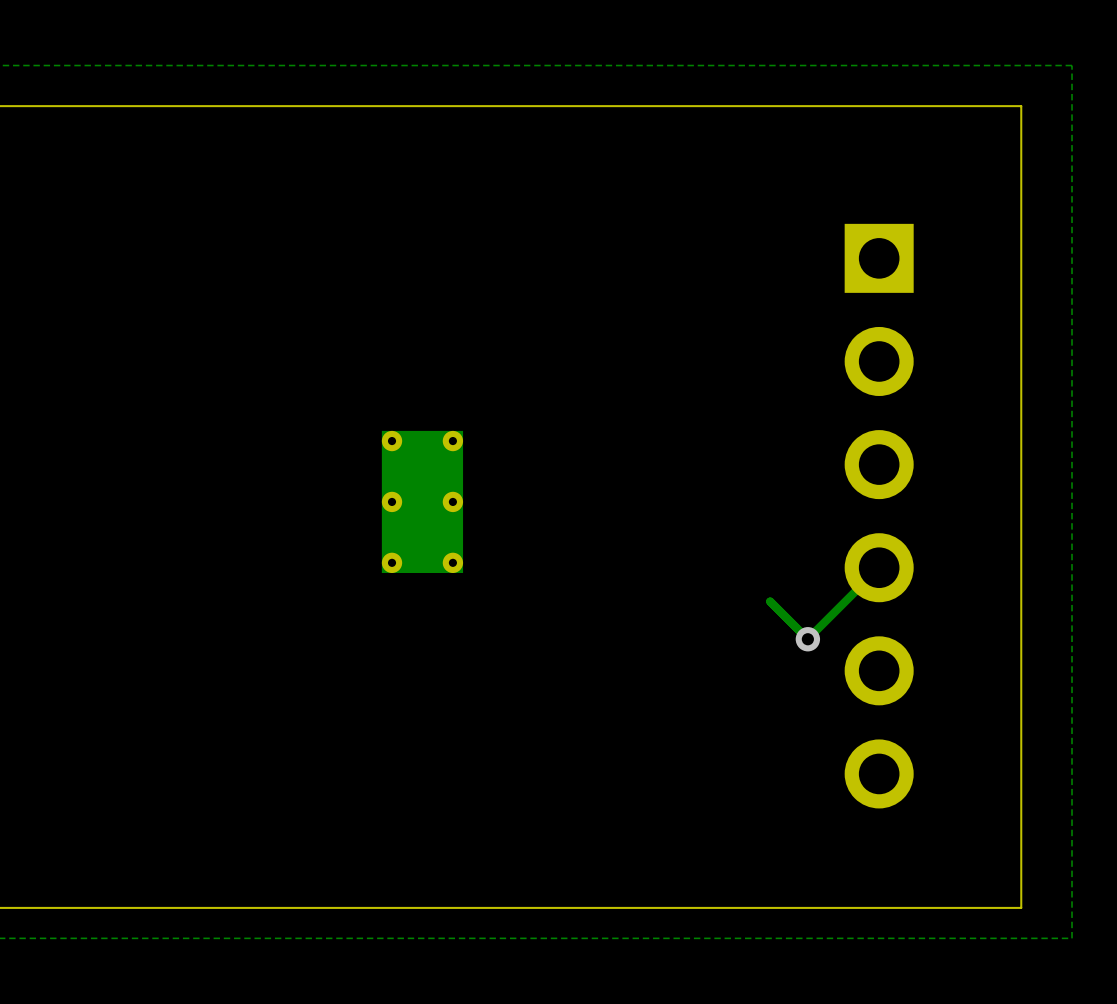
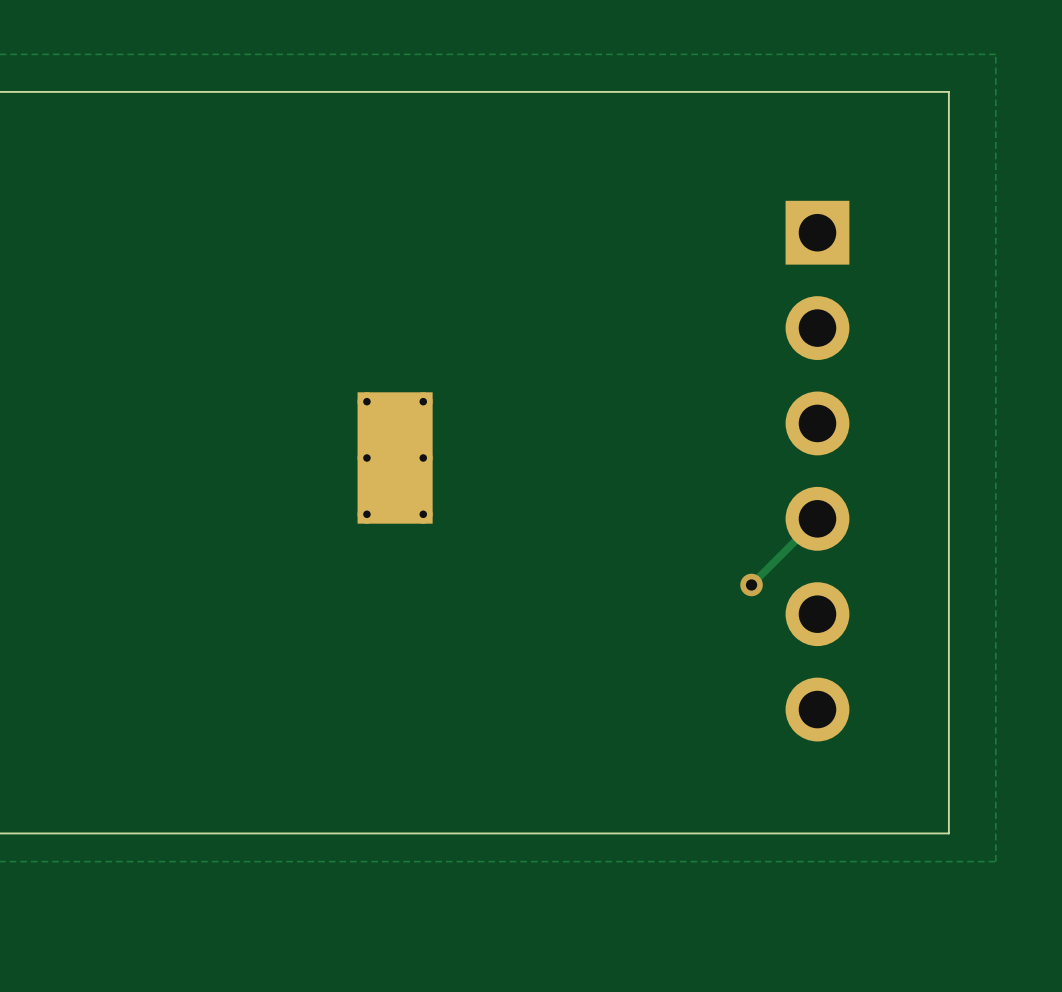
track: (770, 601) (807, 638) -> none

